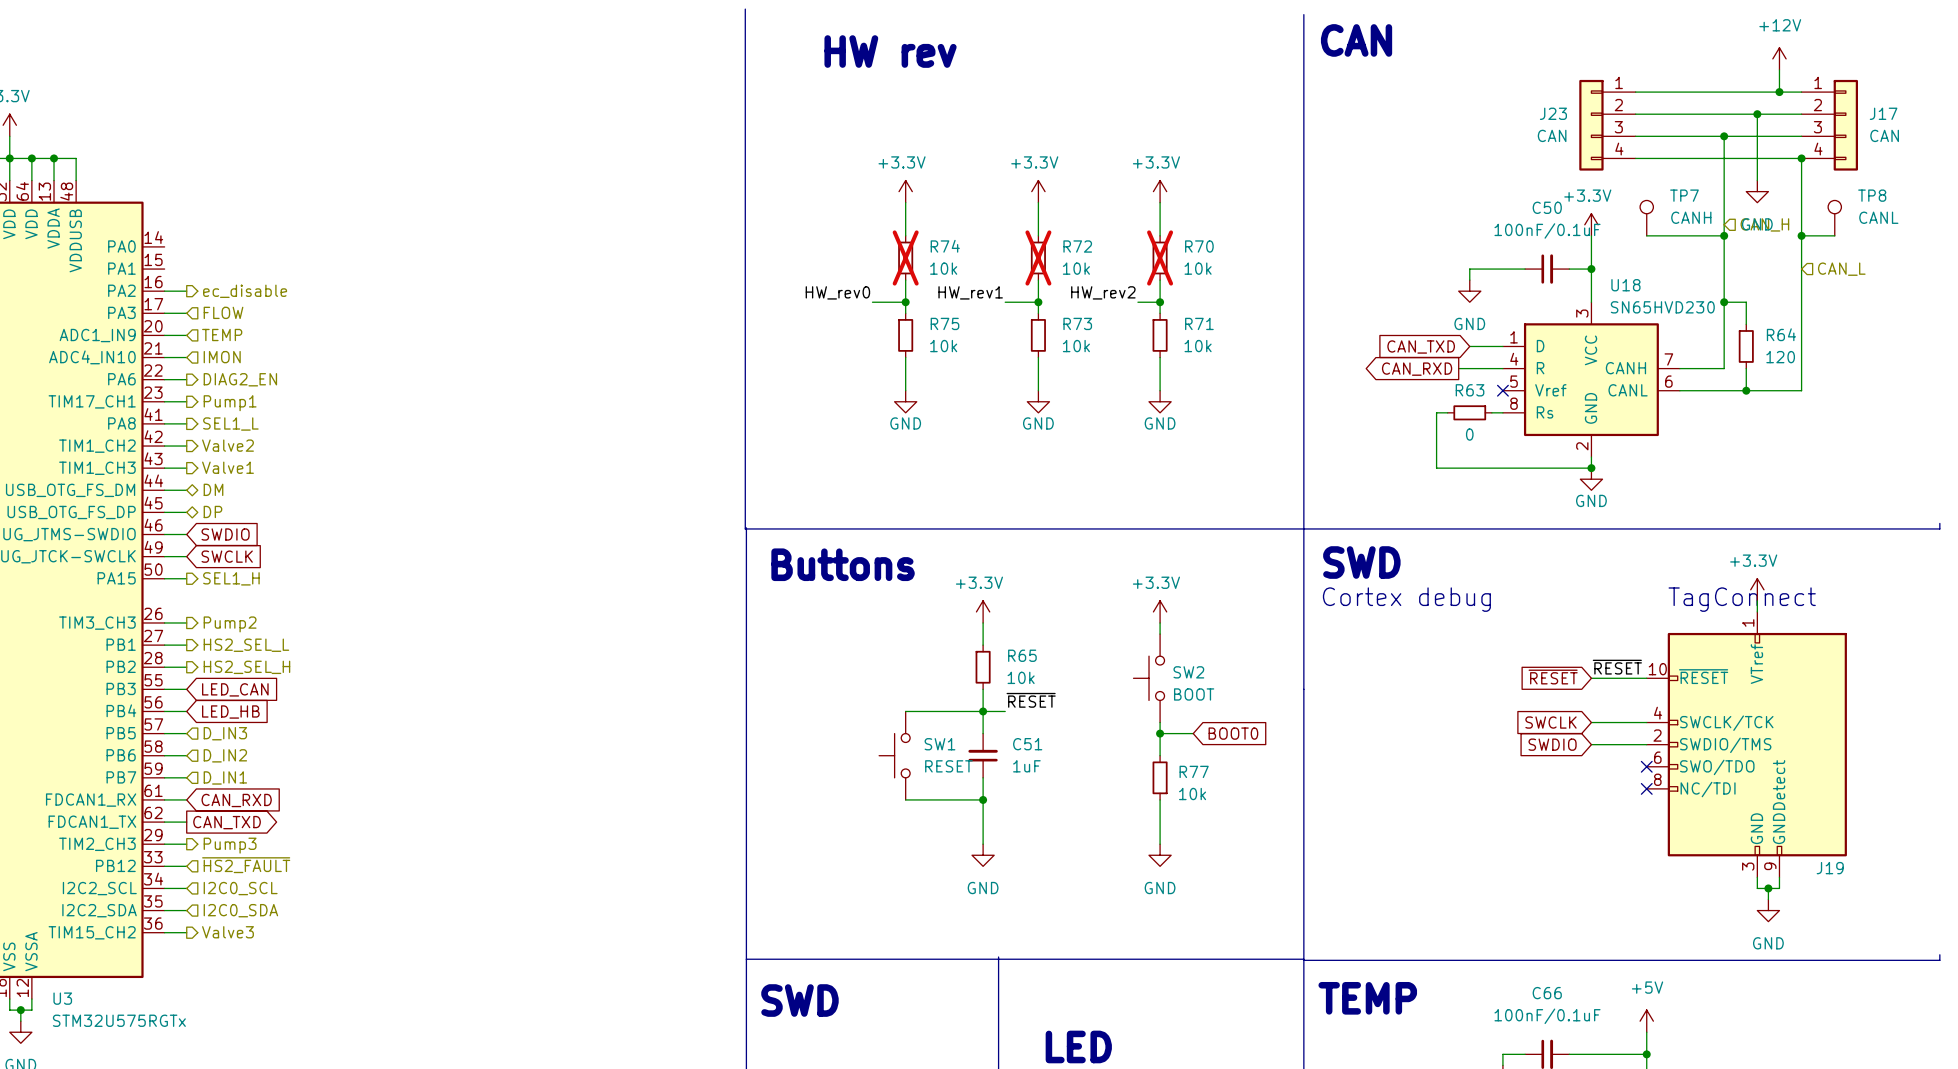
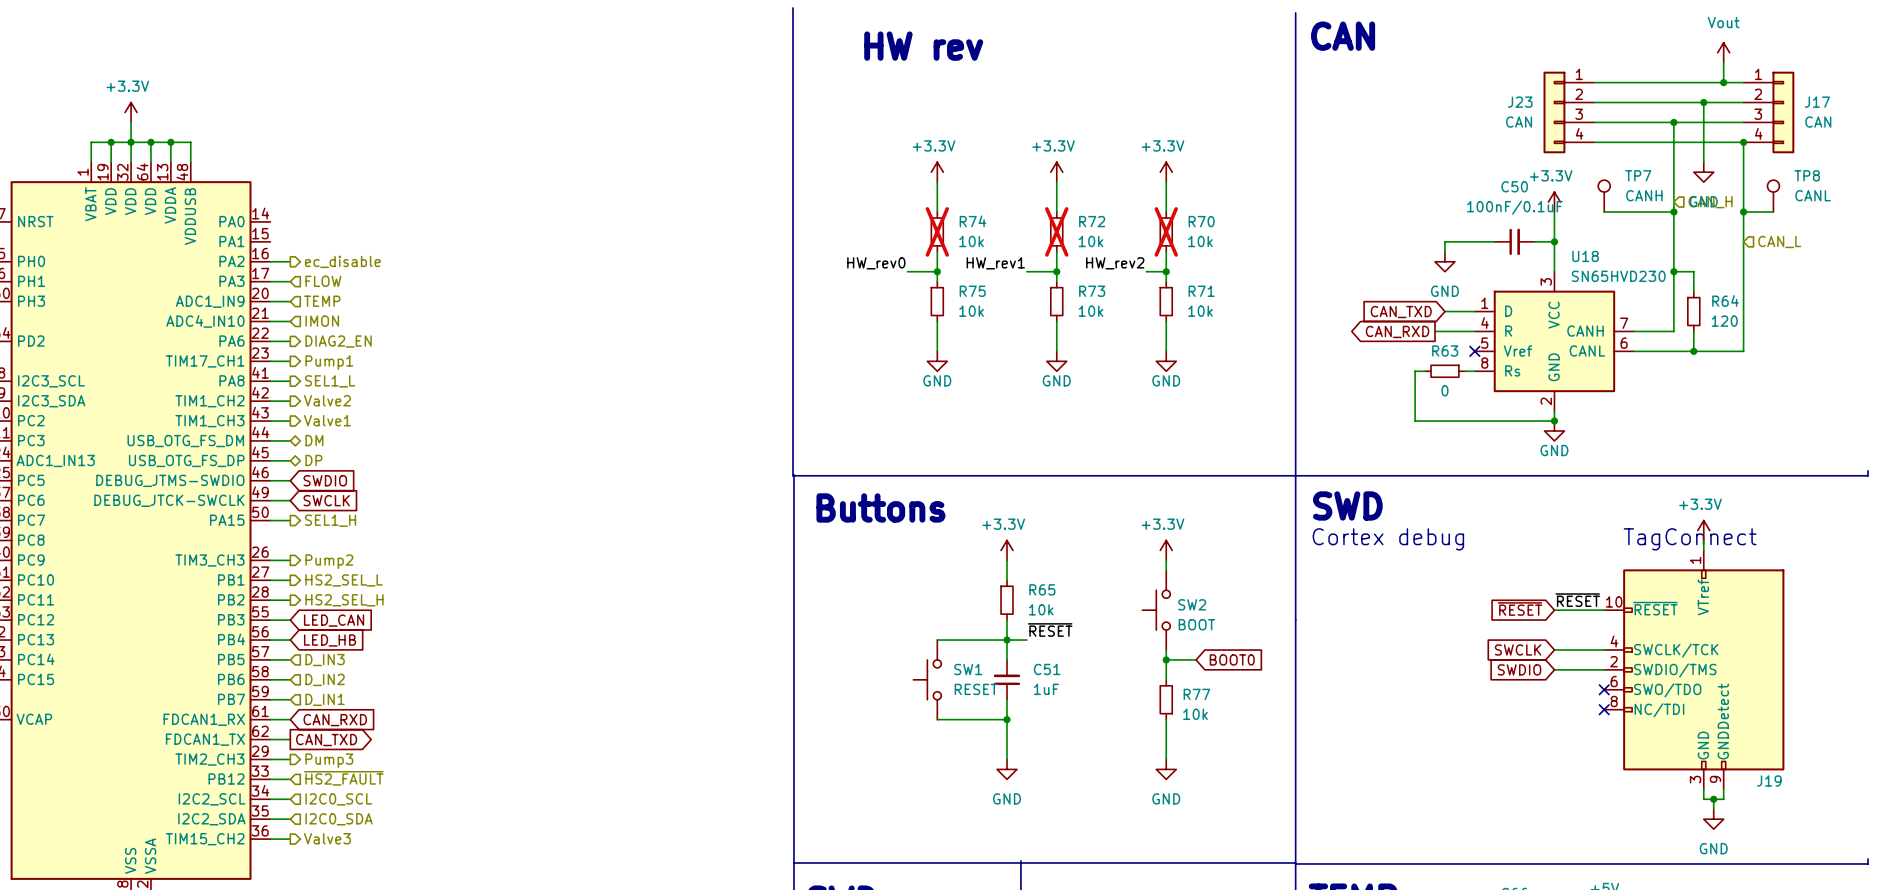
power symbol: +12V (1779, 58) -> Vout (1723, 52)

